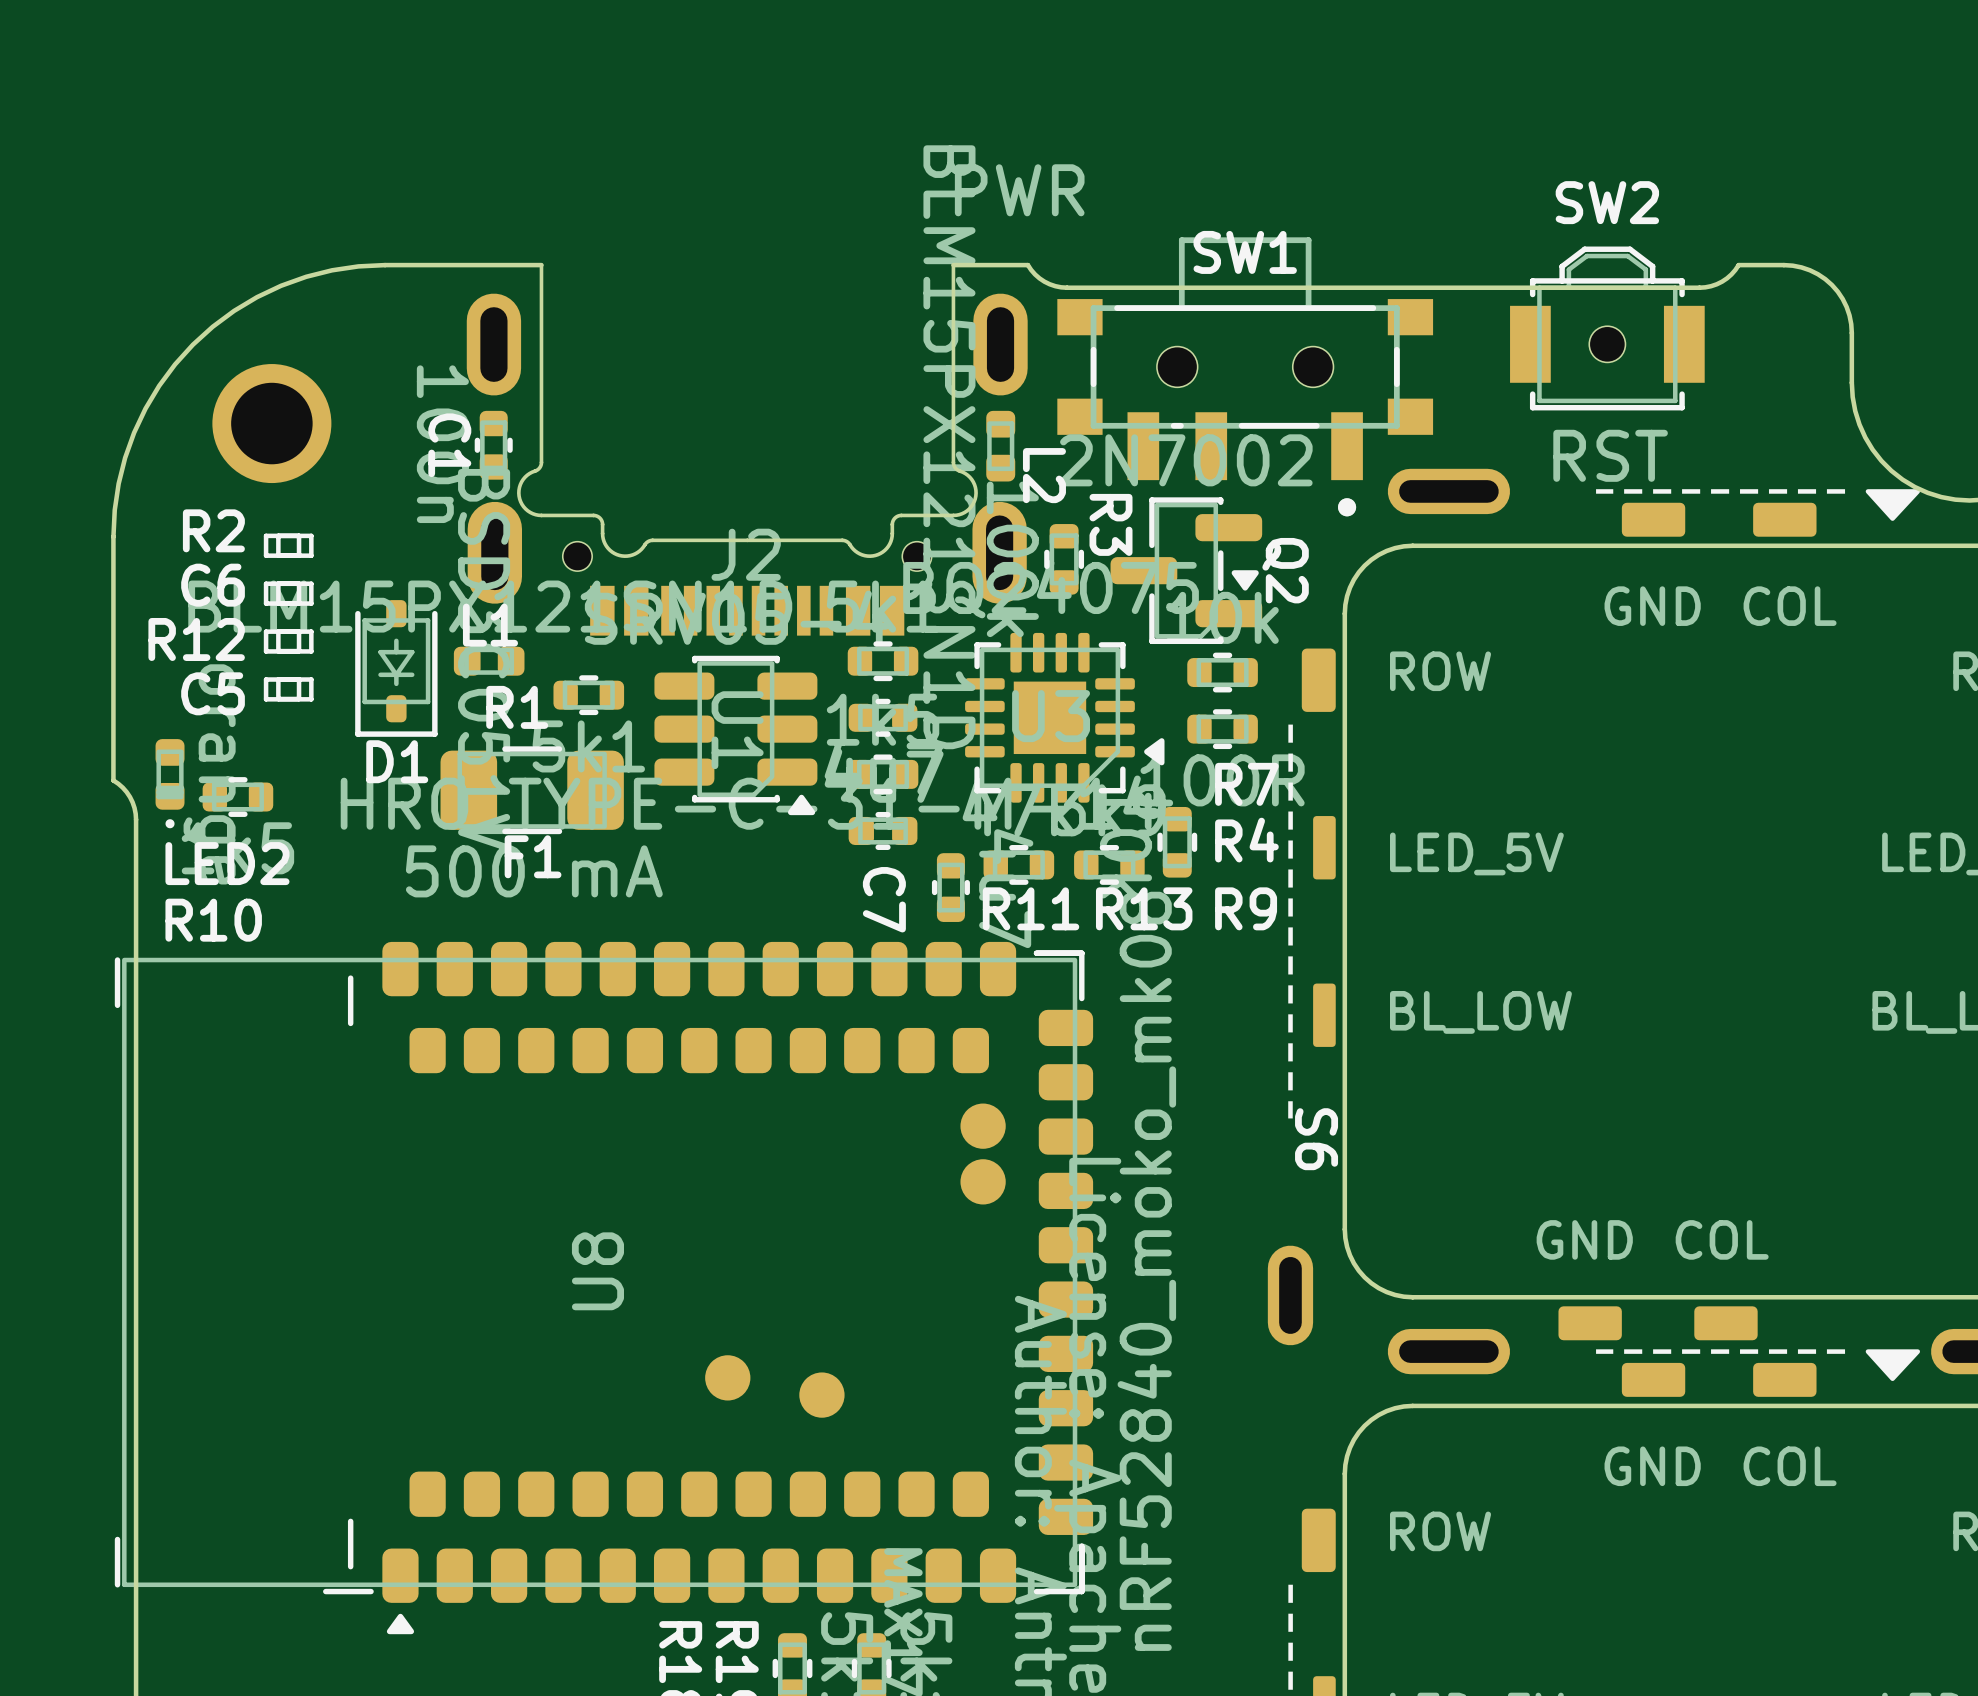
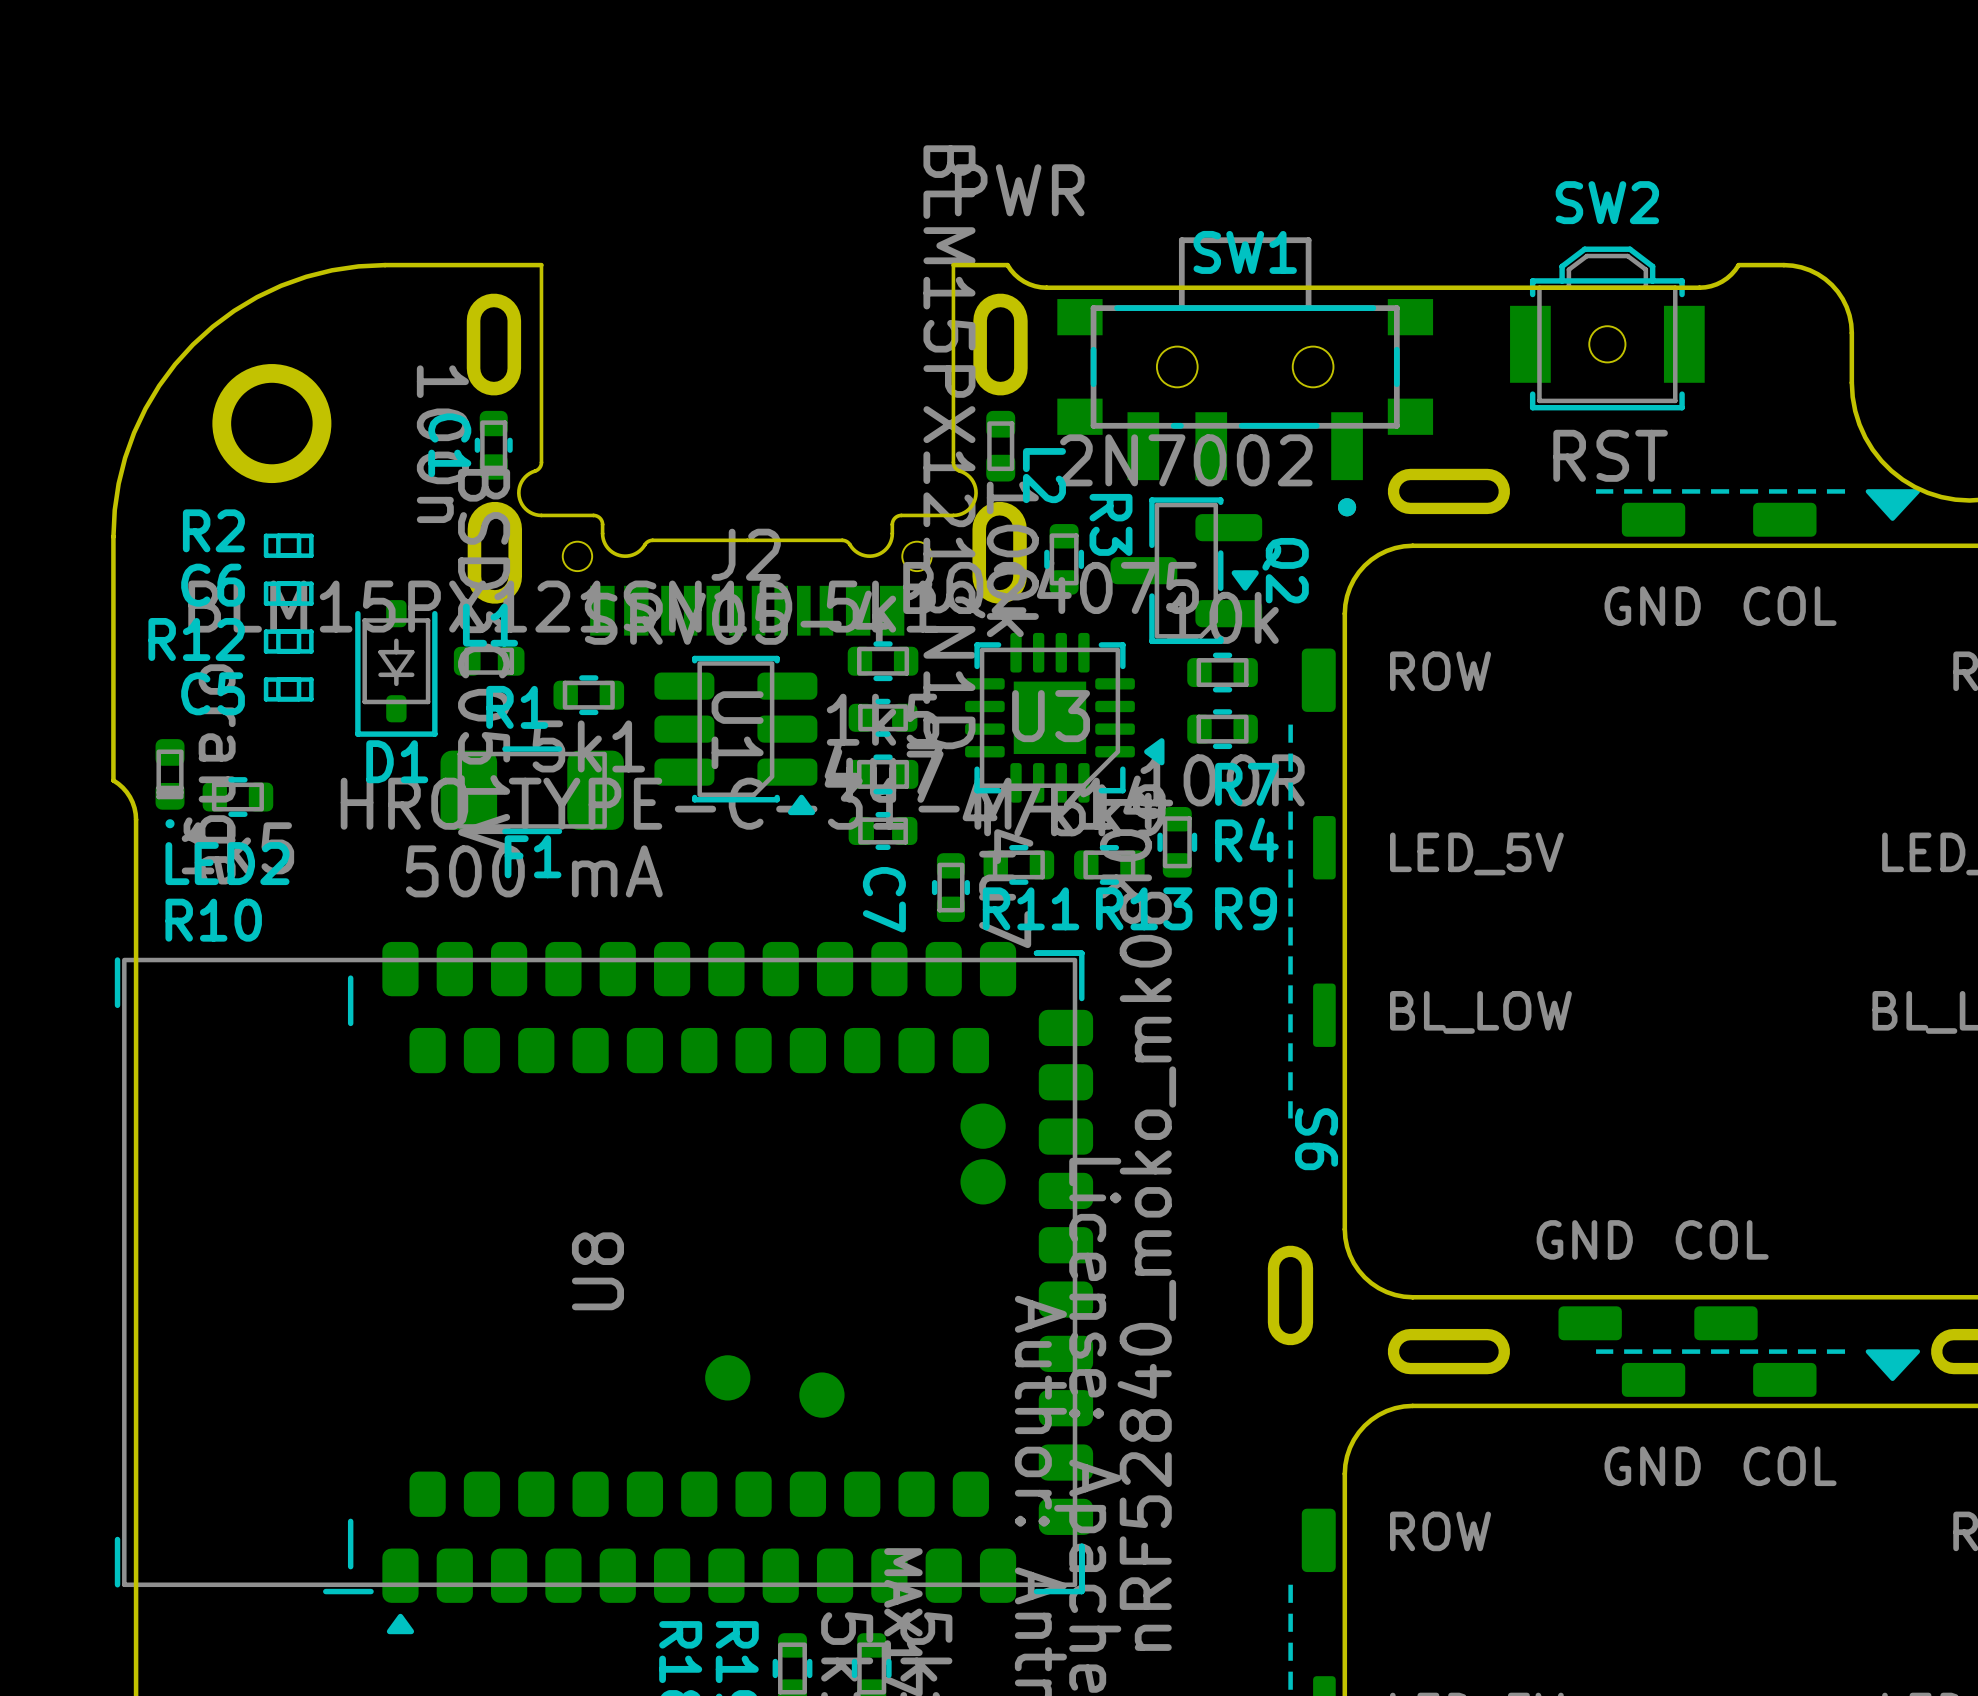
board edge: (1007, 265) (1027, 265) (1035, 274) (1044, 281) (1055, 286) (1067, 287) -> (1007, 265) (1014, 274) (1029, 284) (1040, 287) (1067, 287)

